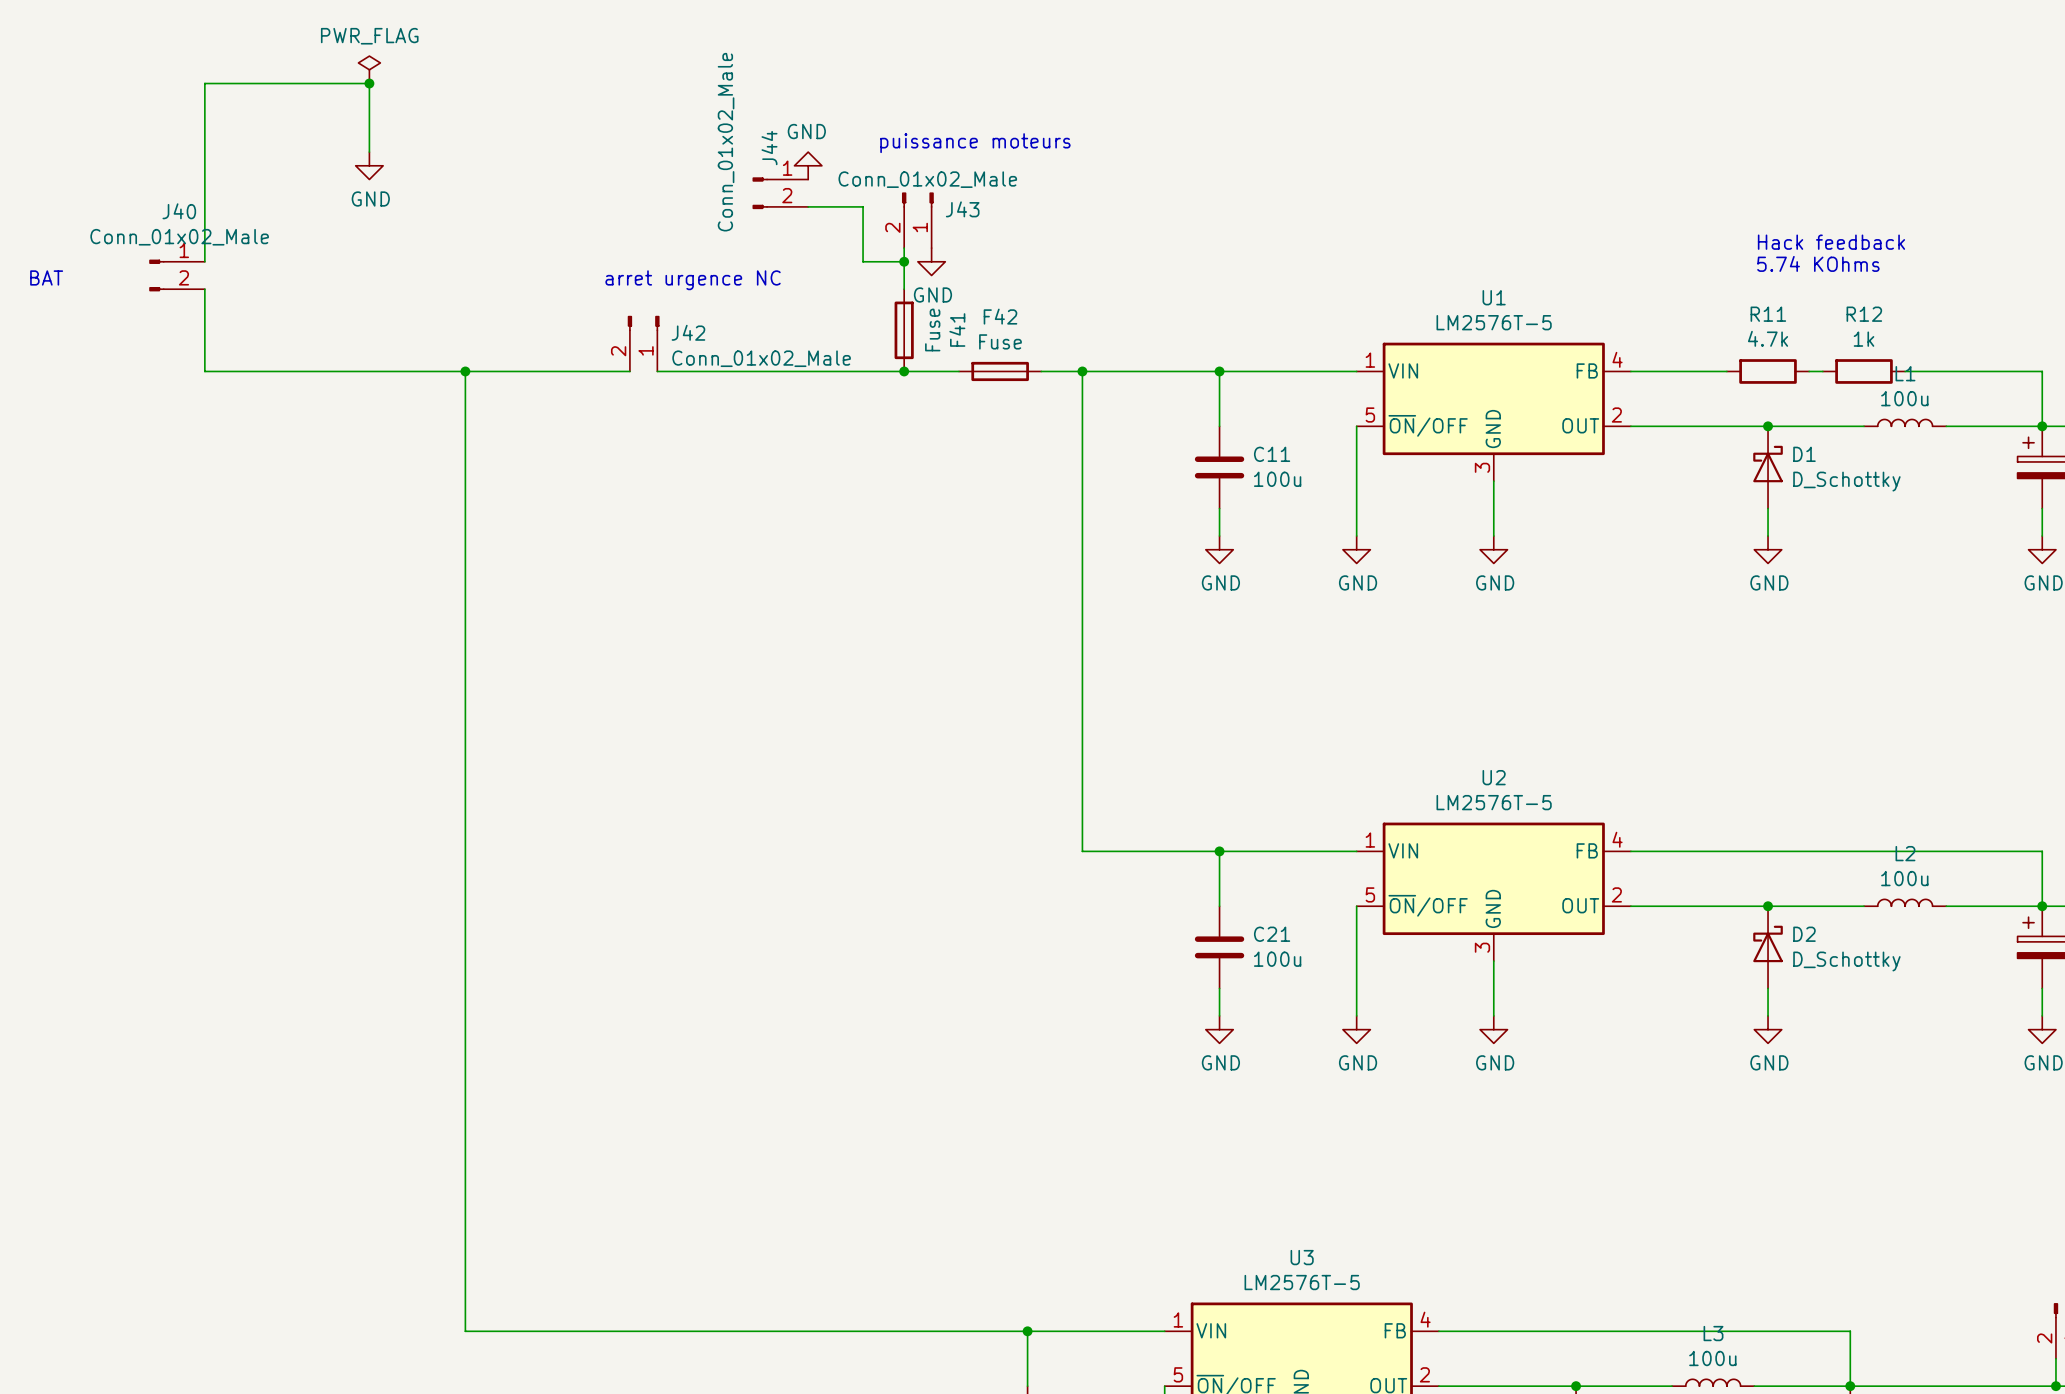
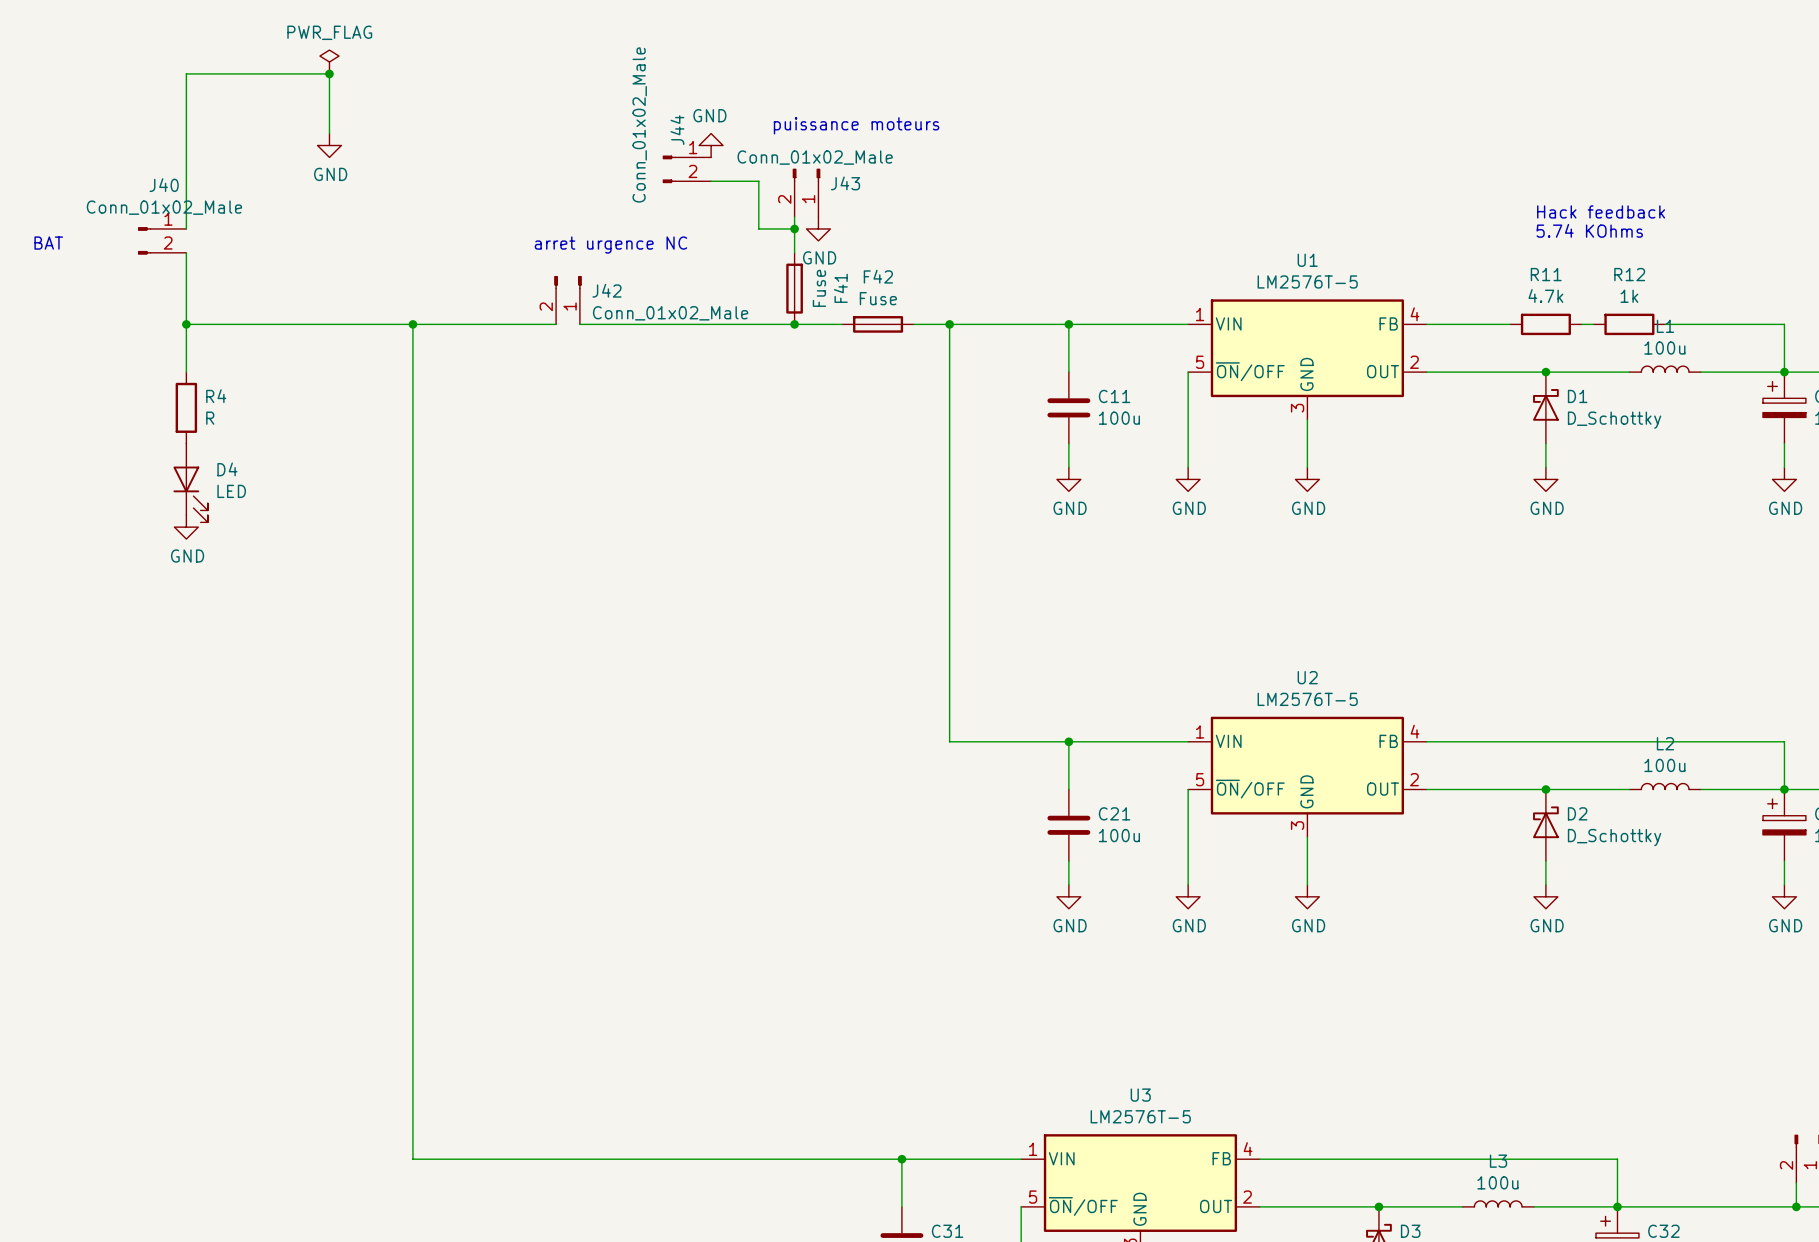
wire: none -> (186, 324) (186, 372)
junction: none -> (186, 324)
R4: none -> R (186, 407)
D4: none -> LED (190, 483)
power symbol: none -> GND (186, 527)

